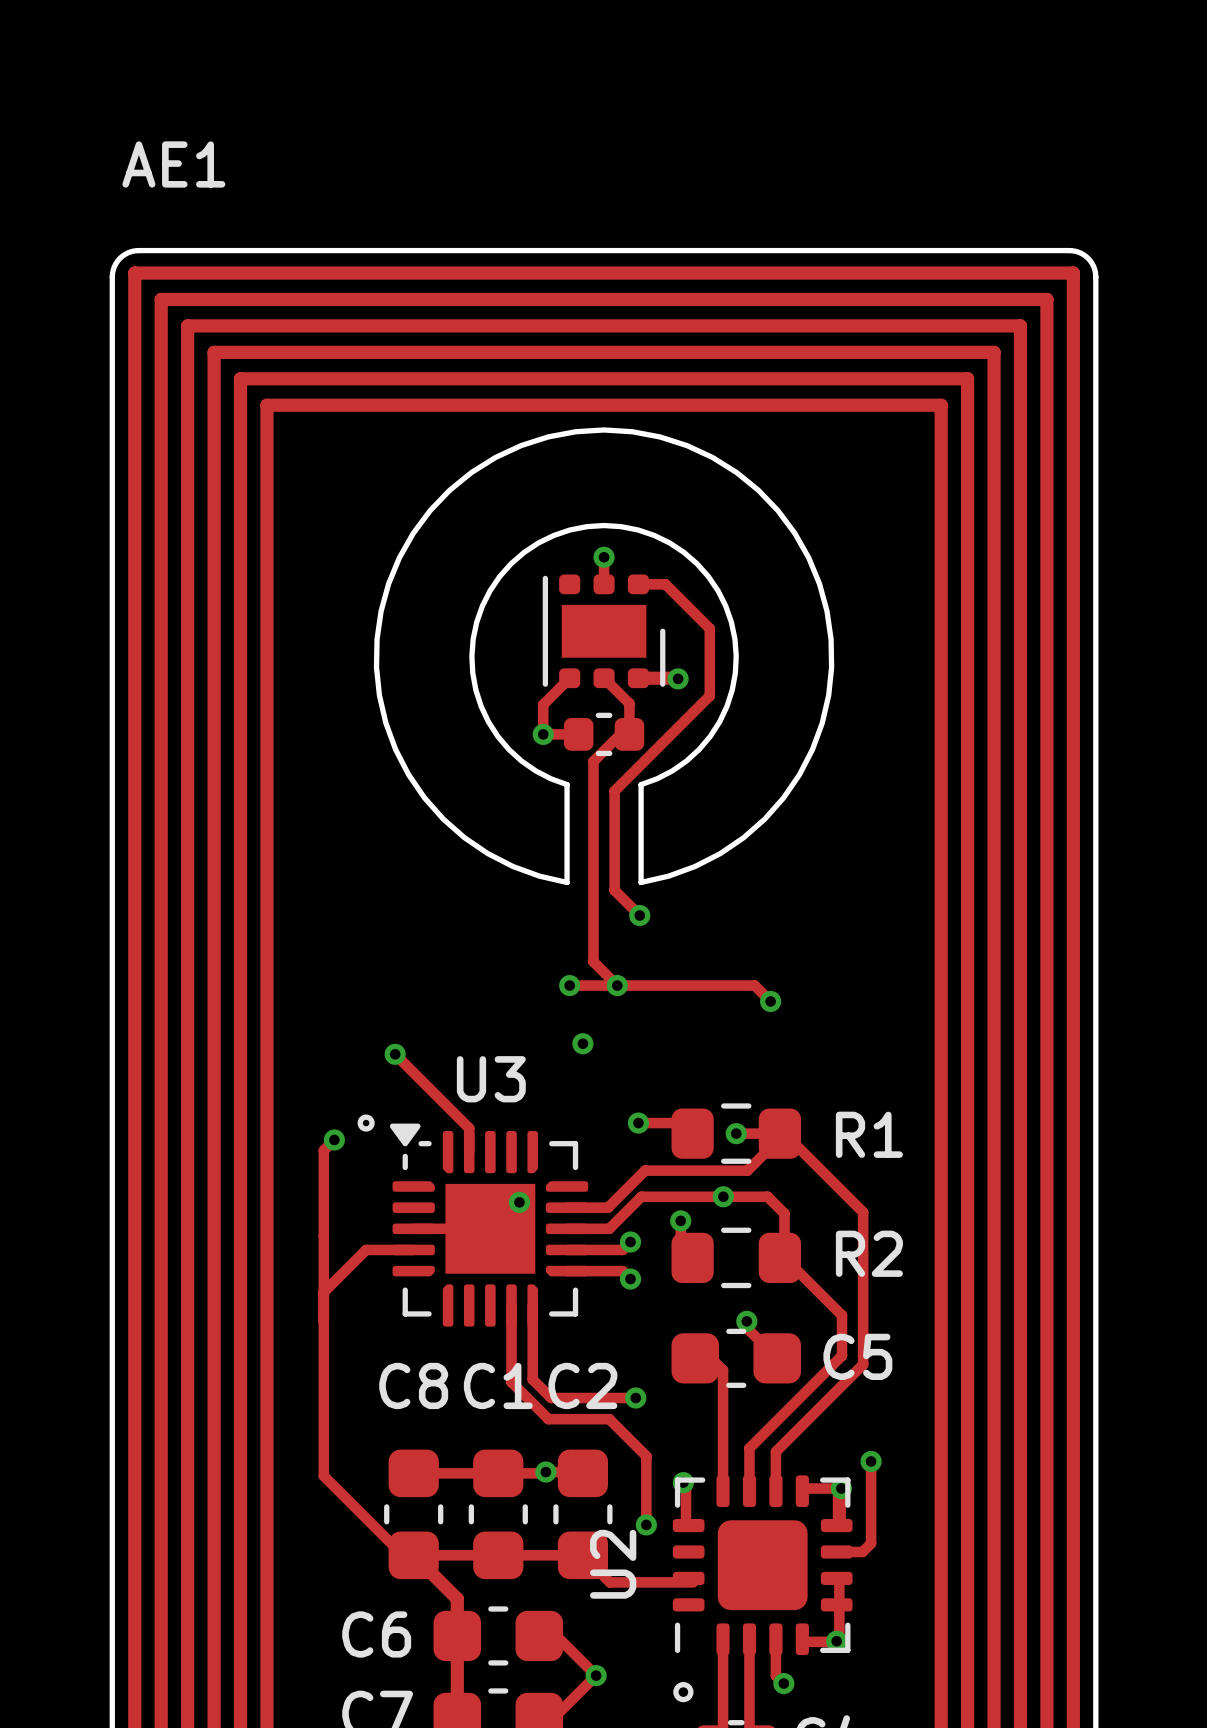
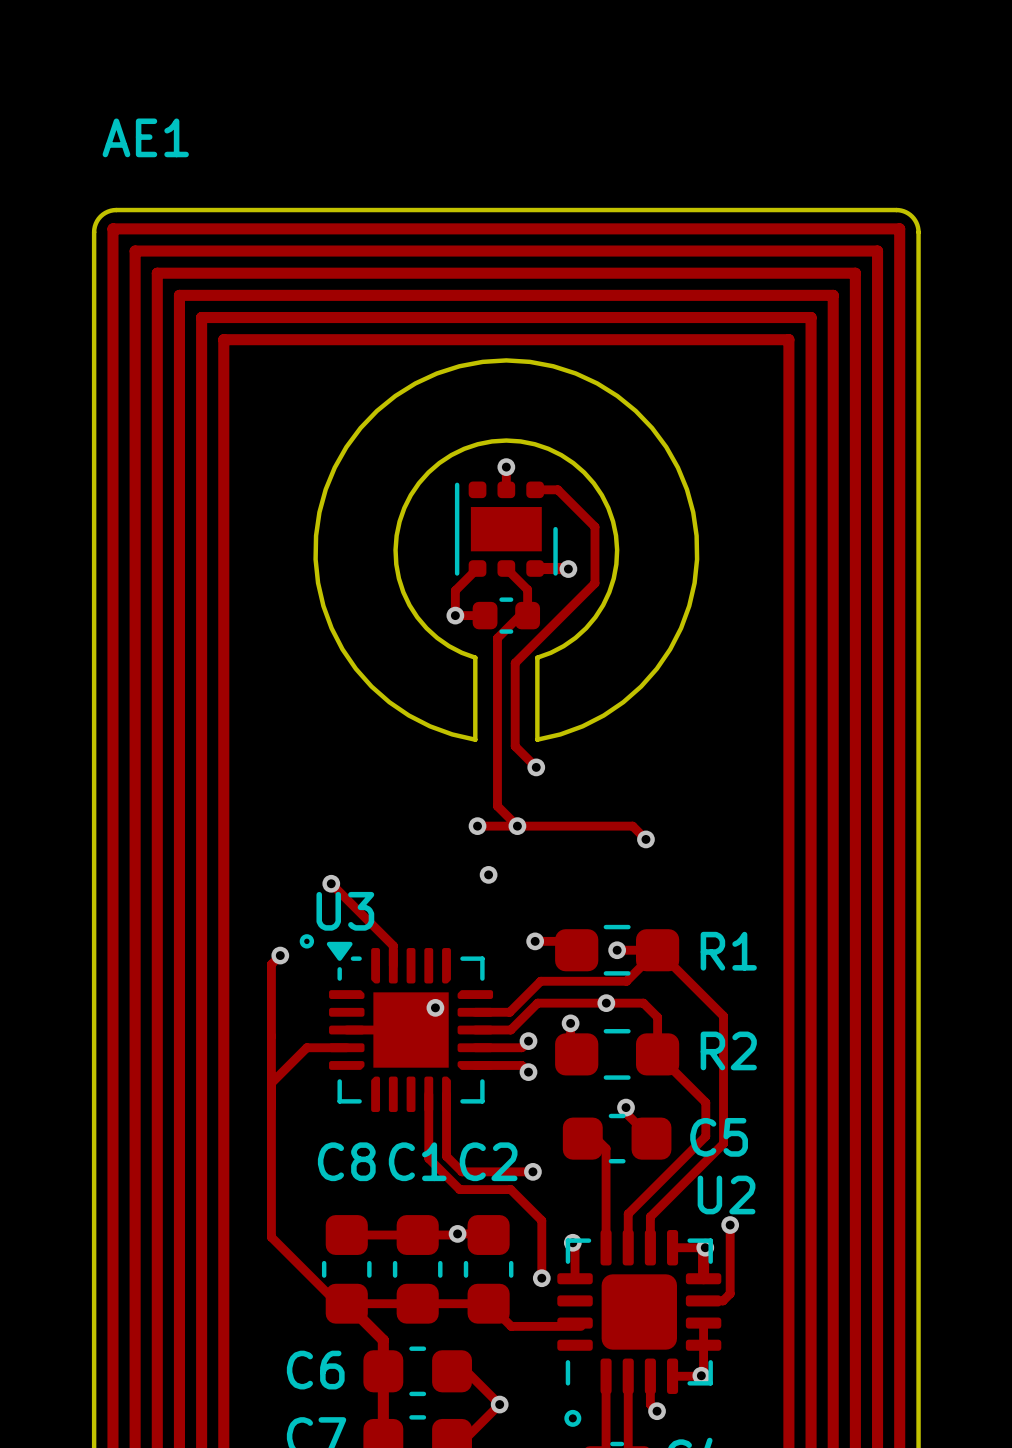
U3 name position: U3 (491, 1079) -> U3 (345, 911)
R1 footprint: [671, 1103, 802, 1164] -> [555, 924, 680, 976]
R2 footprint: [671, 1227, 802, 1289] -> [555, 1029, 680, 1080]
U2 footprint: [672, 1475, 853, 1703] -> [557, 1229, 722, 1427]
U2 name rotation: 0° (613, 1564) -> 90° clockwise (726, 1194)
U2 name position: U2 (613, 1564) -> U2 (726, 1194)

